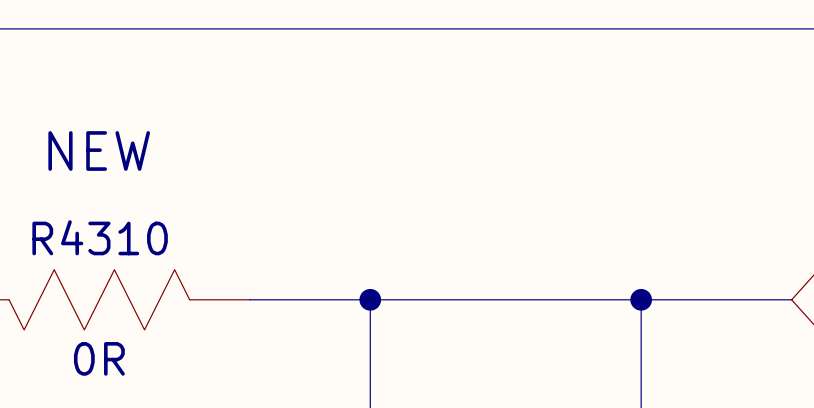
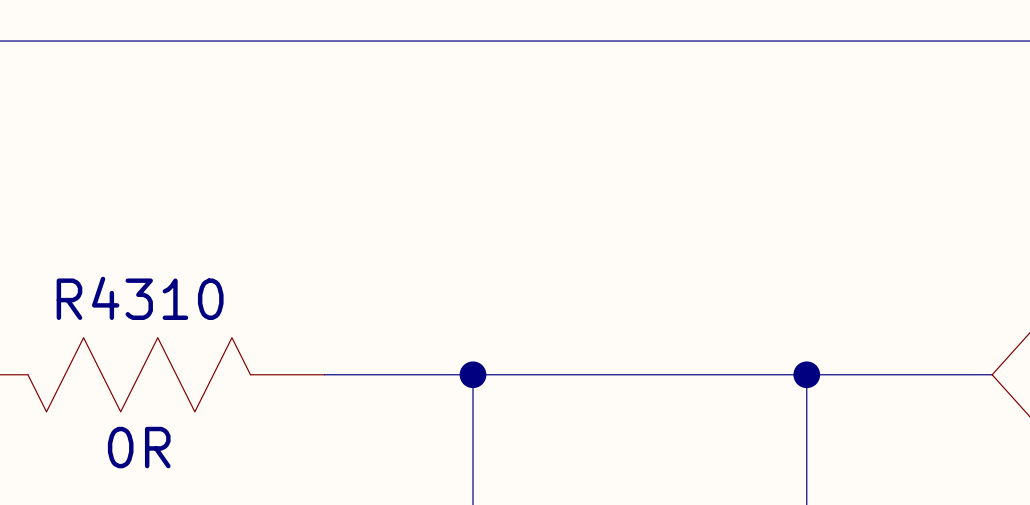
text: NEW (99, 151) -> none

